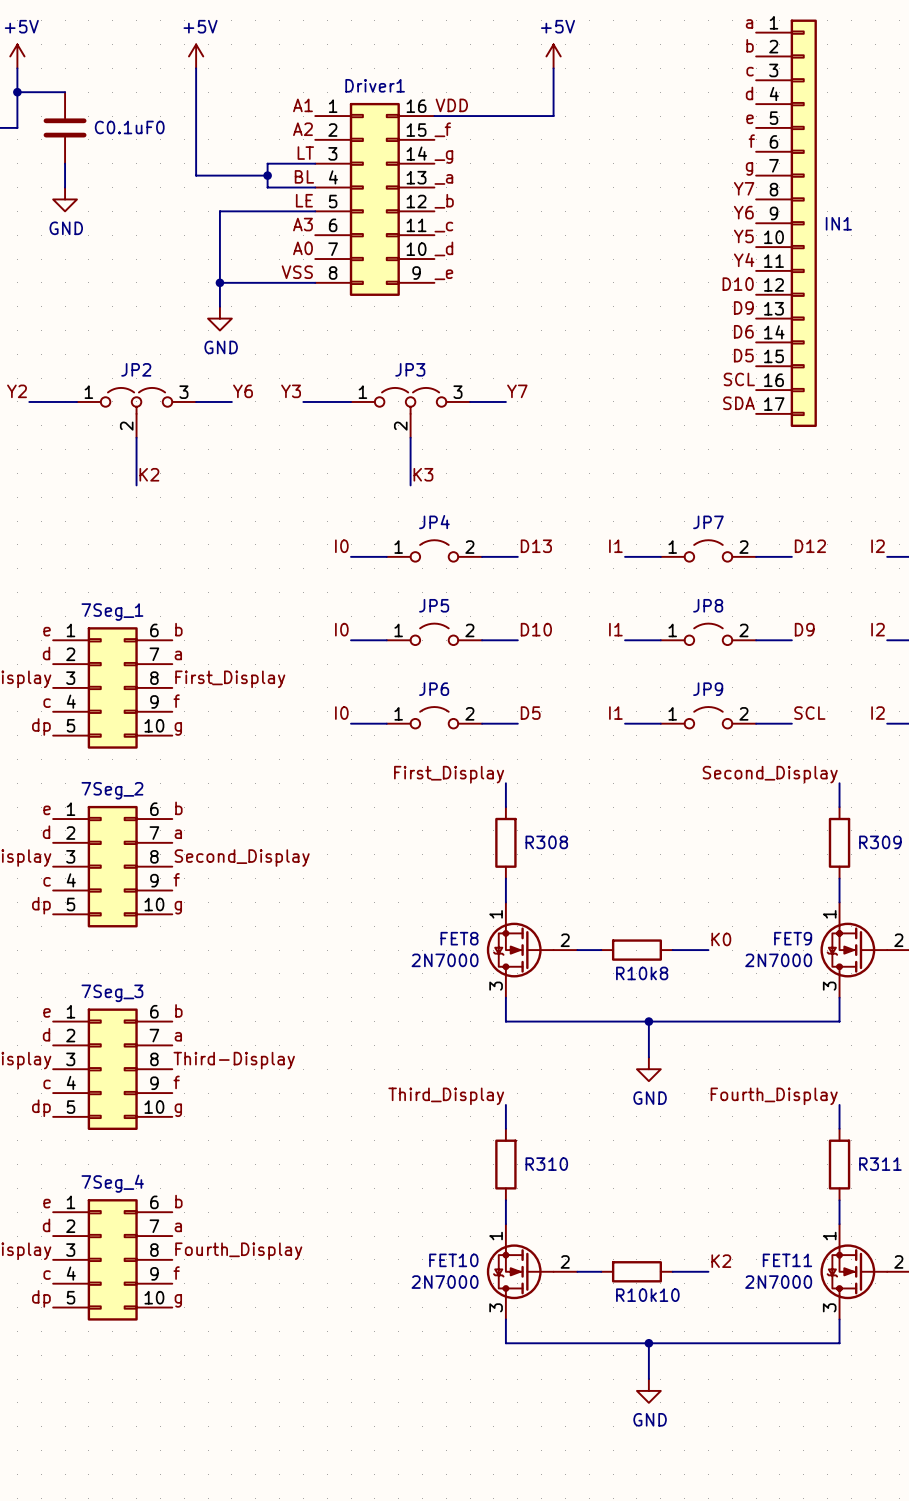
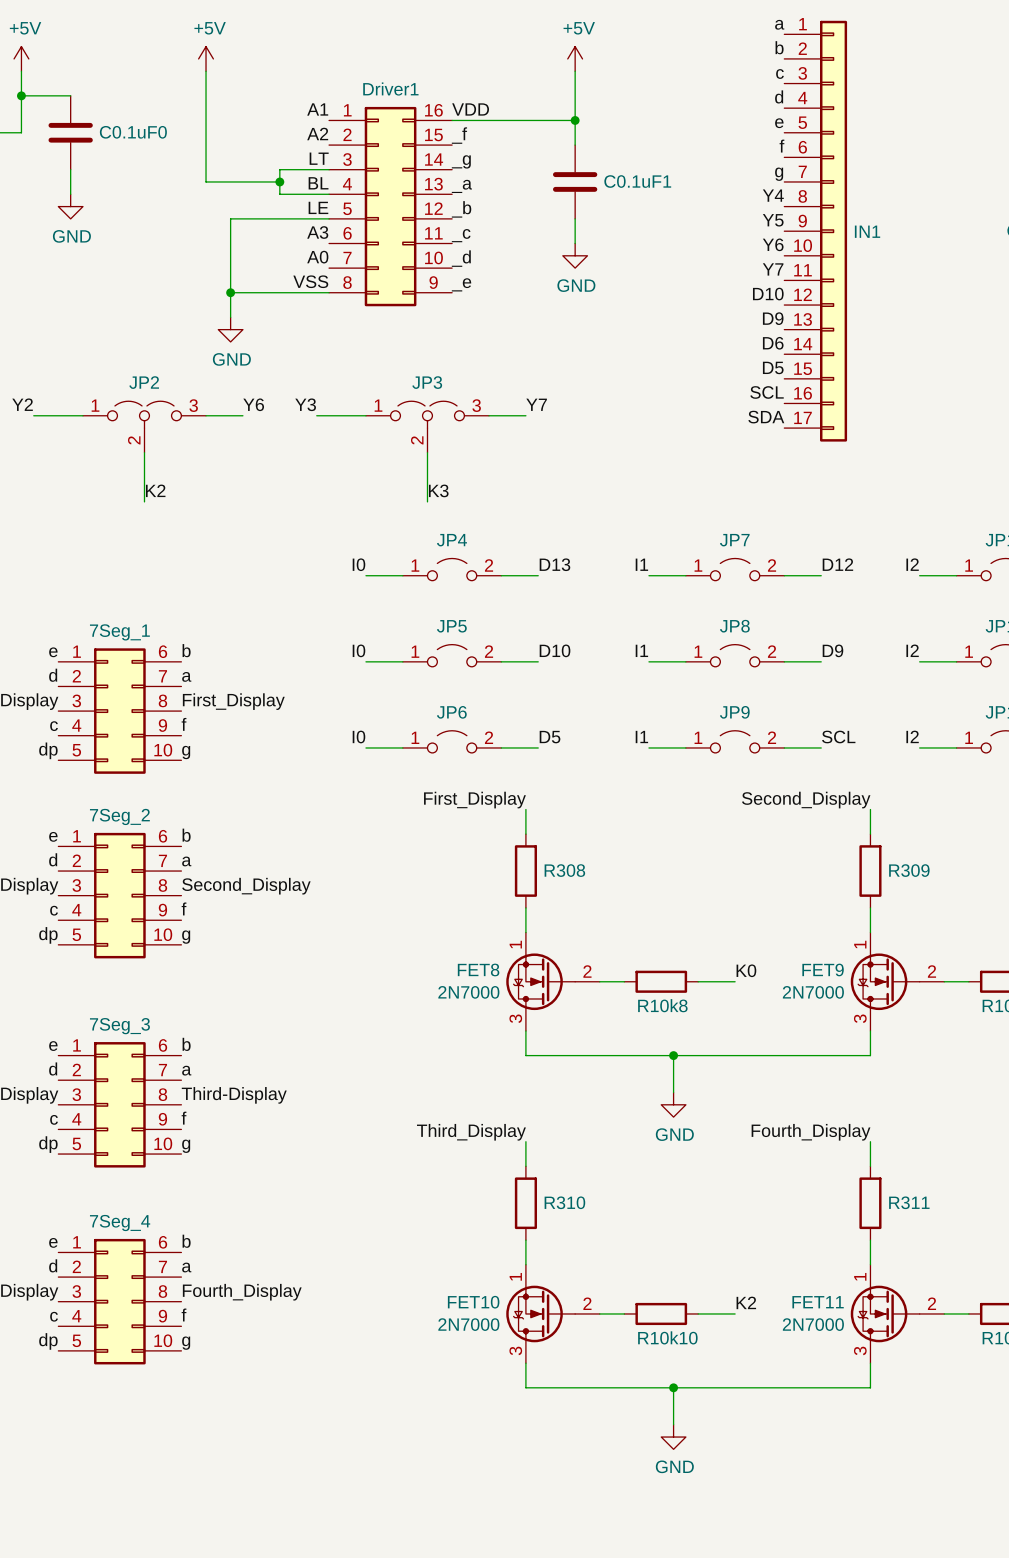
wire: none -> (575, 120) (575, 145)
junction: none -> (575, 120)
C0.1uF1: none -> (575, 181)
label: Y7 (744, 188) -> Y4 (773, 195)
wire: none -> (575, 218) (575, 243)
label: Y6 (743, 212) -> Y5 (773, 220)
label: Y5 (743, 236) -> Y6 (773, 244)
power symbol: none -> GND (575, 255)
label: Y4 (744, 260) -> Y7 (773, 269)

